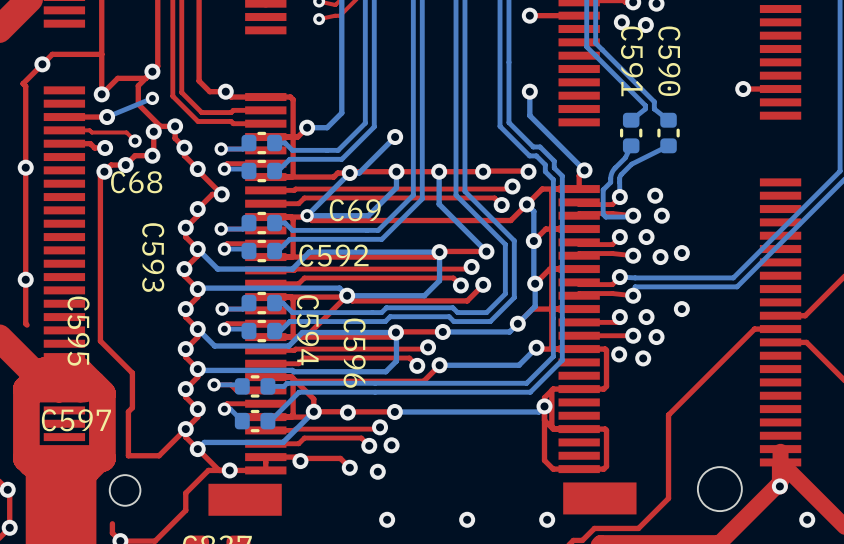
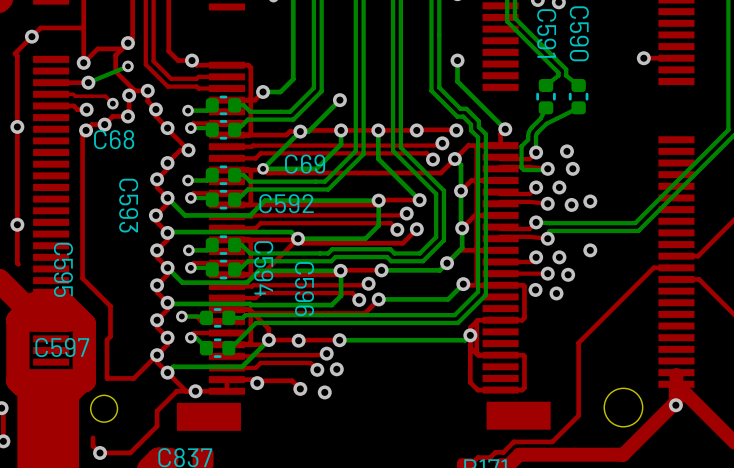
via: (387, 519) -> none
via: (467, 519) -> none
via: (547, 519) -> none
via: (807, 519) -> none

